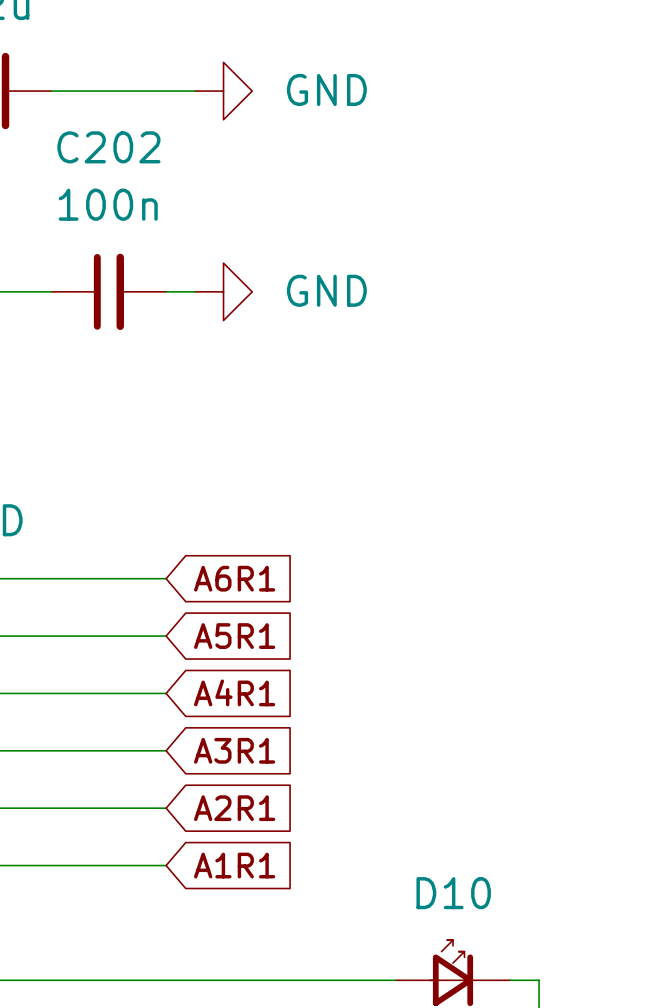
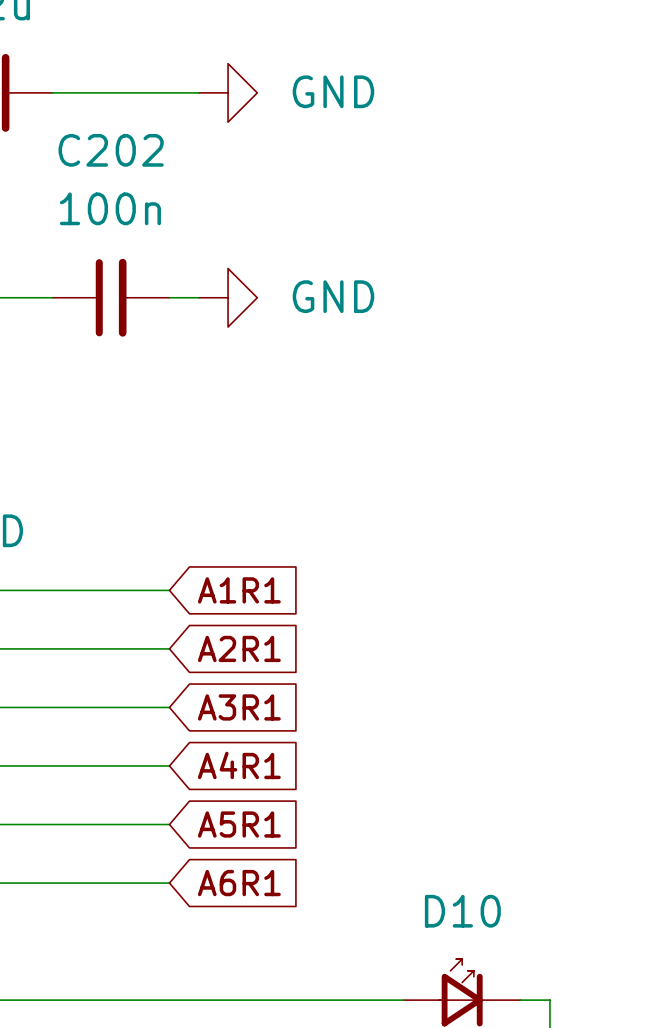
global label: A6R1 (234, 578) -> A1R1 (239, 590)
global label: A5R1 (234, 636) -> A2R1 (239, 648)
global label: A4R1 (234, 692) -> A3R1 (239, 707)
global label: A3R1 (234, 750) -> A4R1 (239, 765)
global label: A2R1 (234, 808) -> A5R1 (239, 824)
global label: A1R1 (234, 865) -> A6R1 (239, 883)

